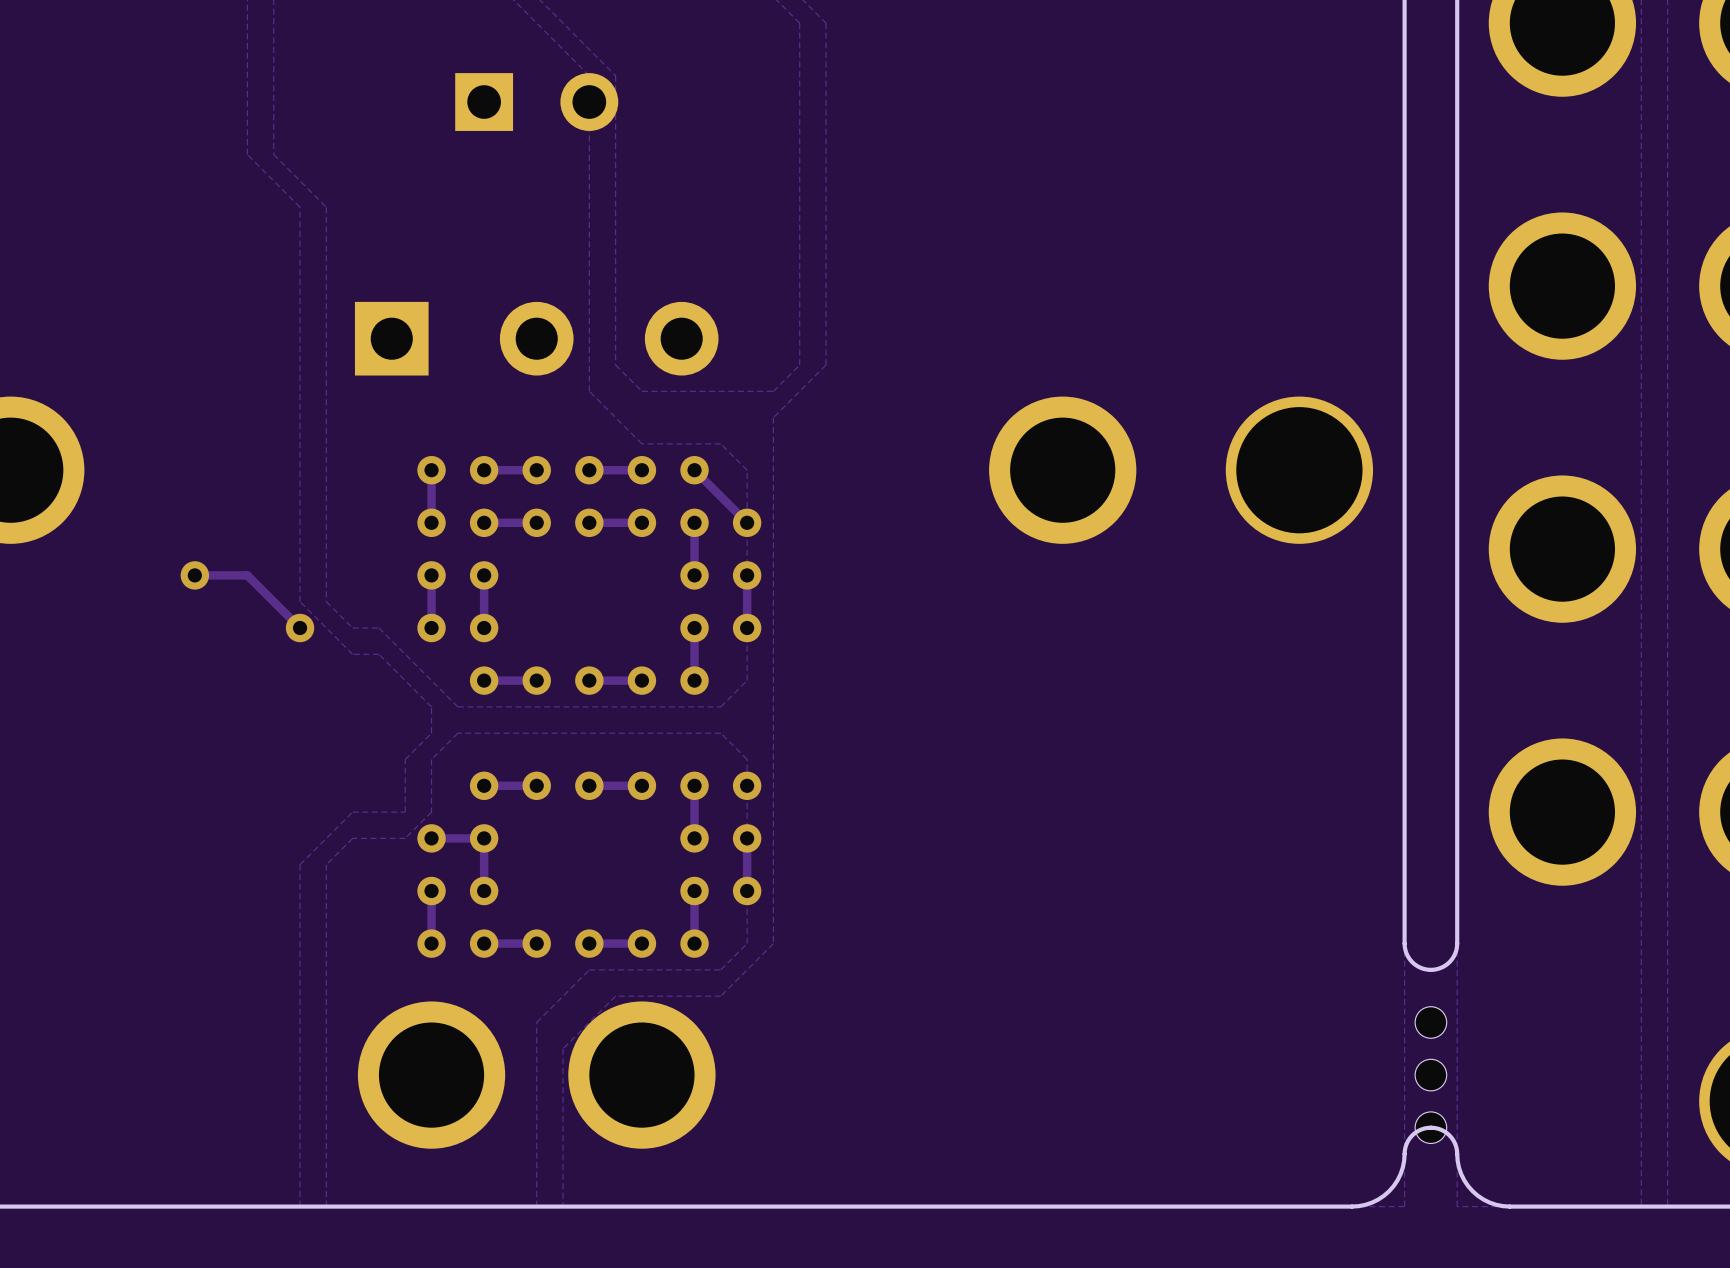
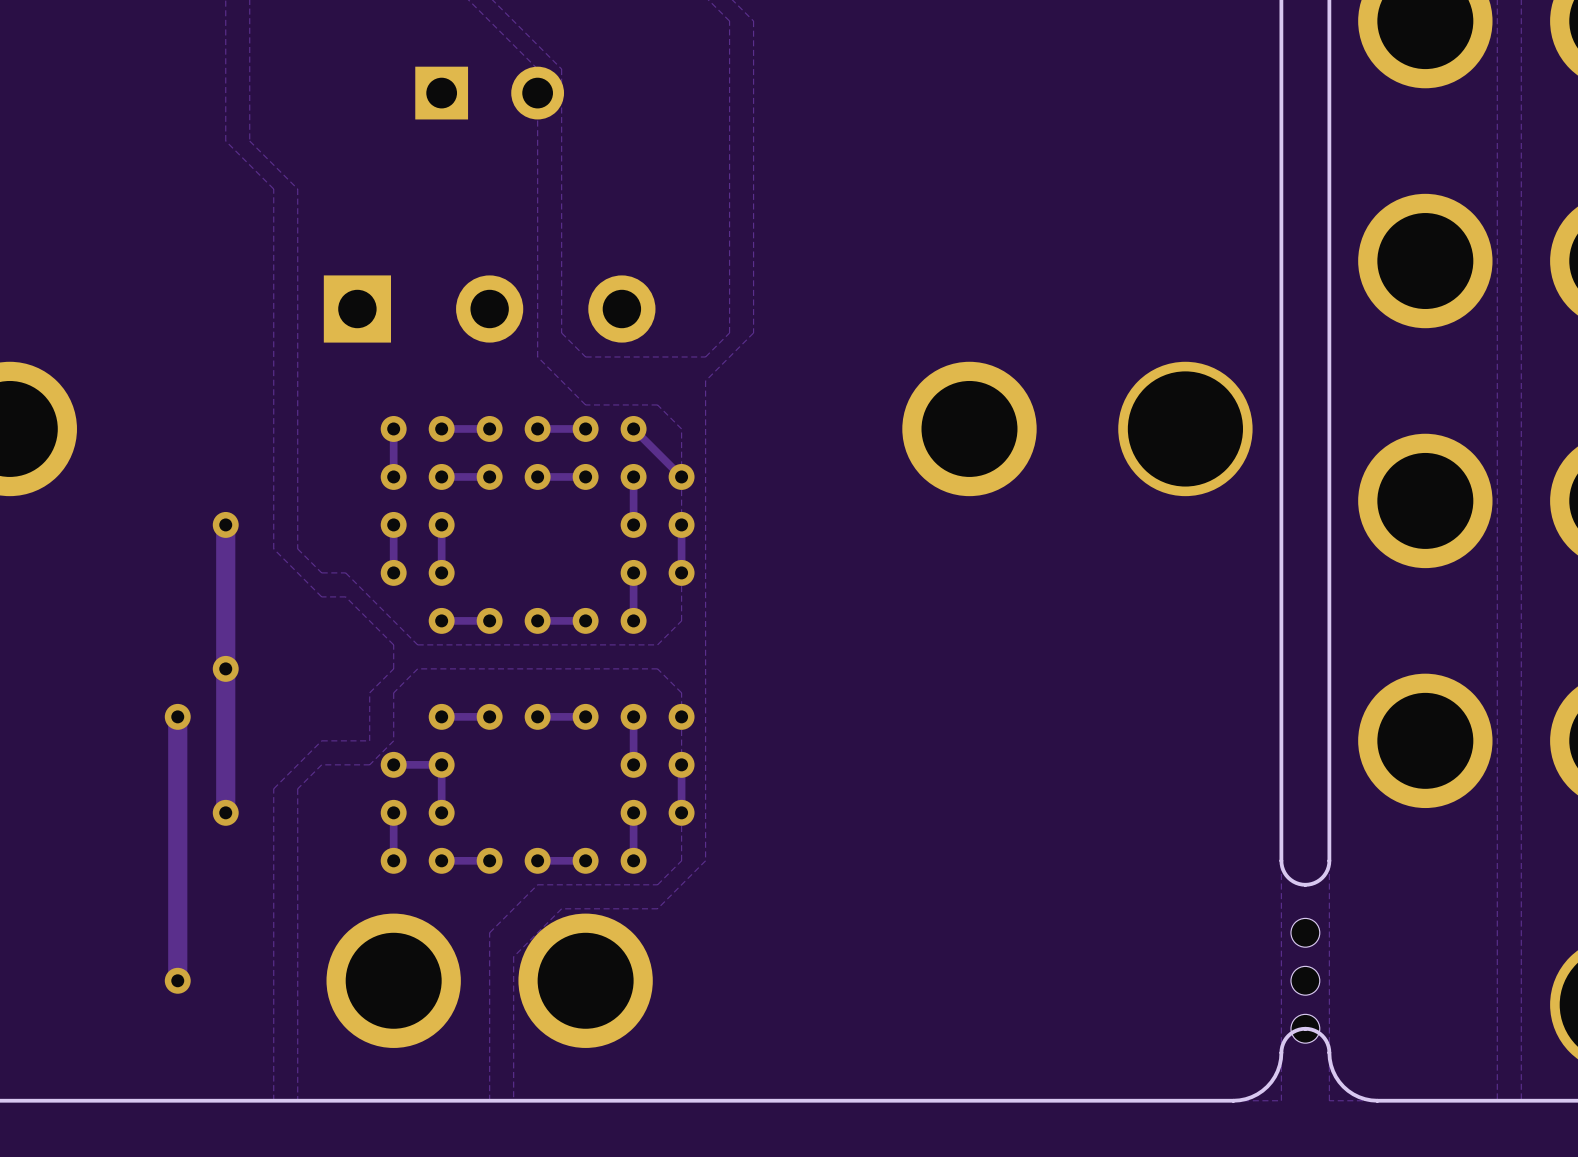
track: (194, 575) (247, 575) (300, 628) -> none
via: (194, 575) -> none
track: none -> (225, 524) (225, 812)
via: none -> (225, 524)
via: (300, 628) -> none
via: none -> (225, 668)
track: none -> (177, 716) (177, 980)
via: none -> (177, 716)
via: none -> (225, 812)
via: none -> (177, 980)

